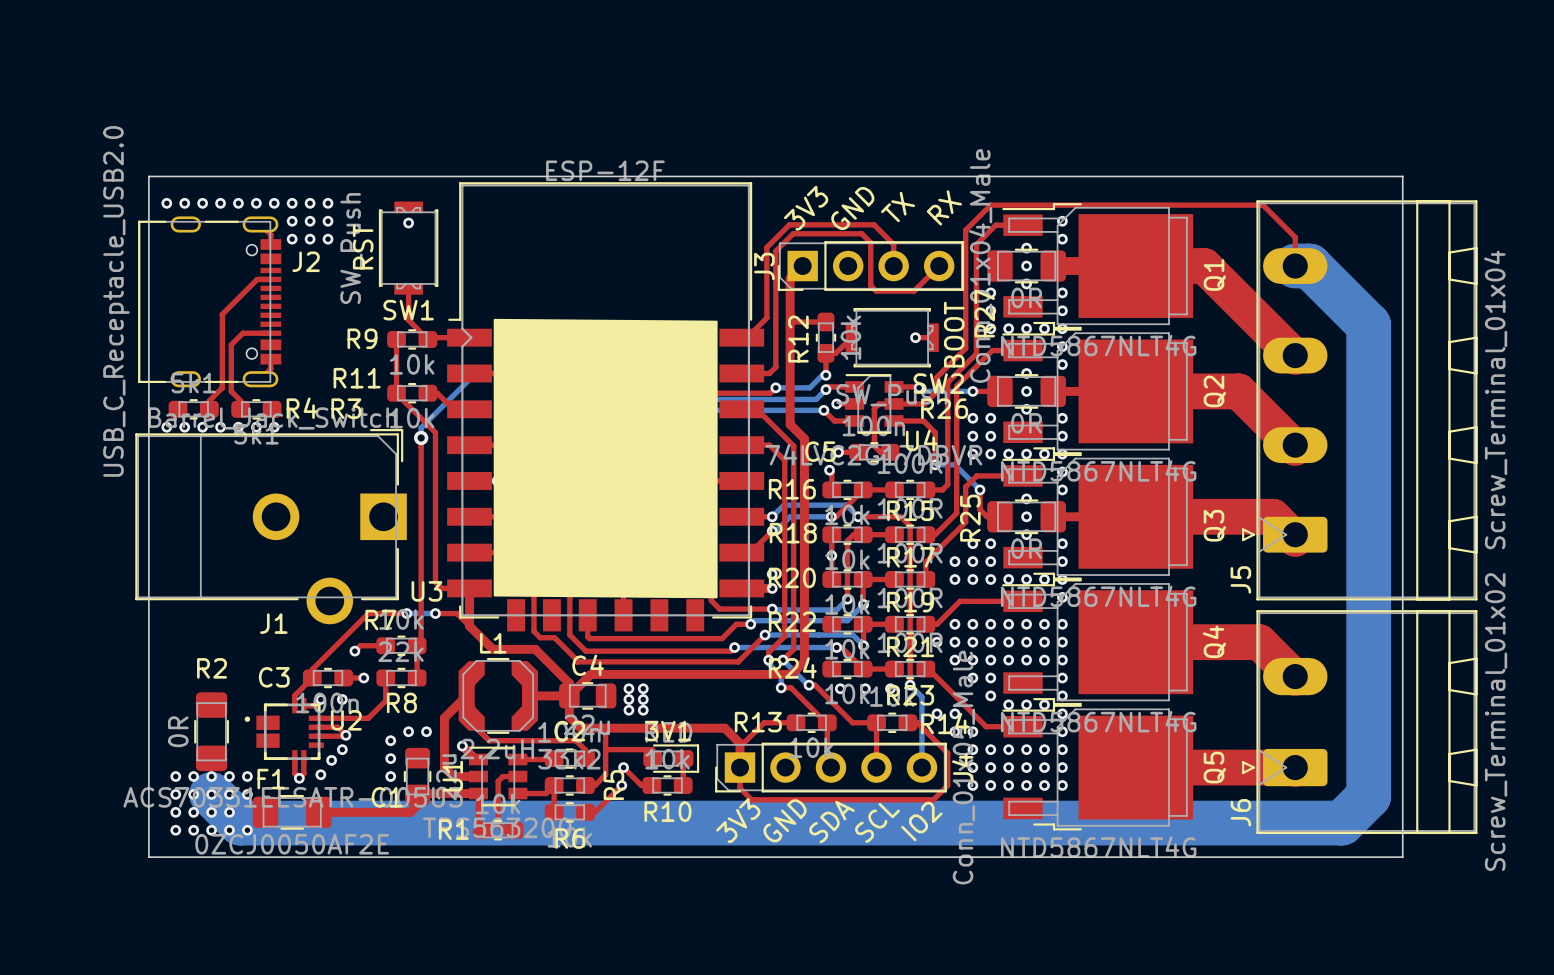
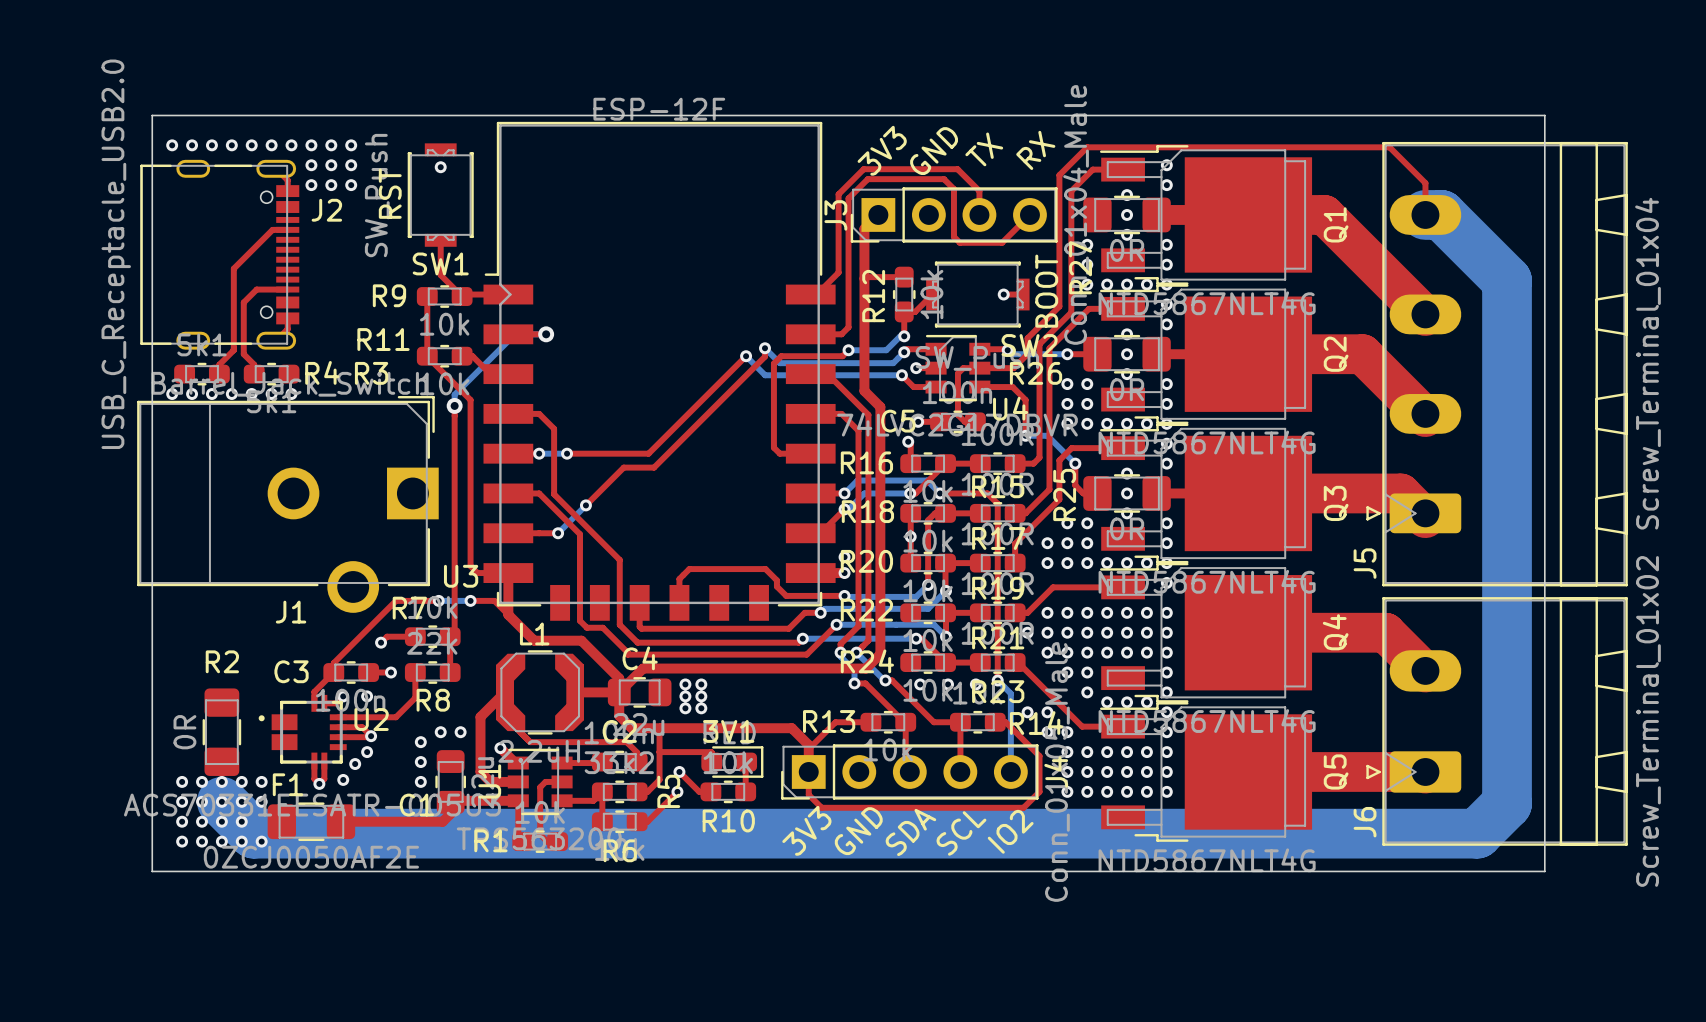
drawing: [493, 318, 718, 599] -> none

